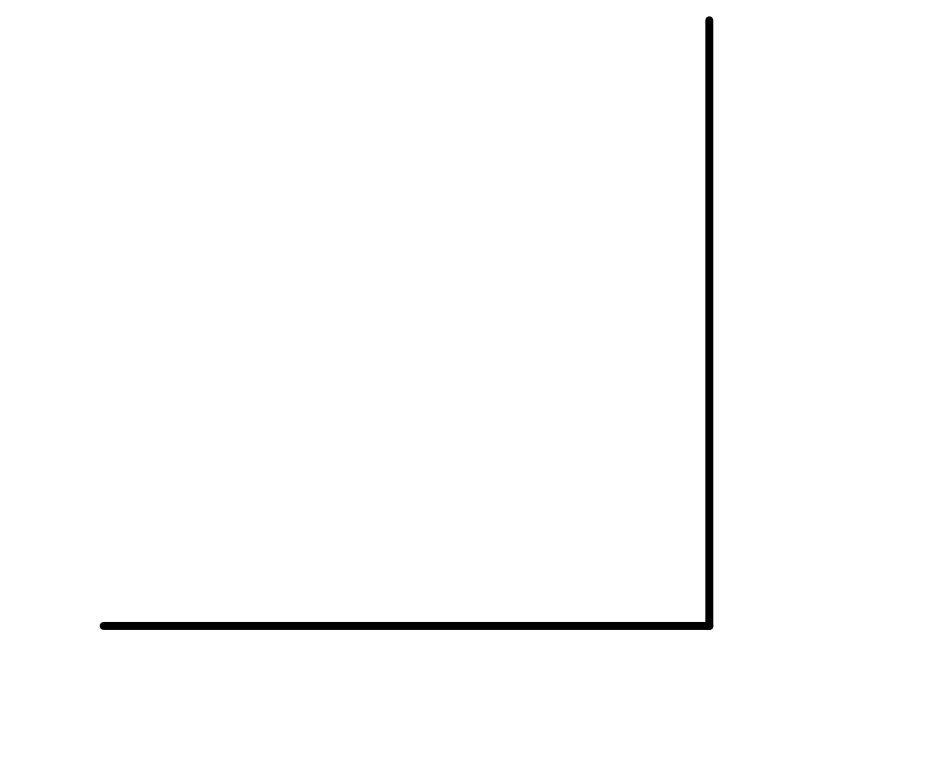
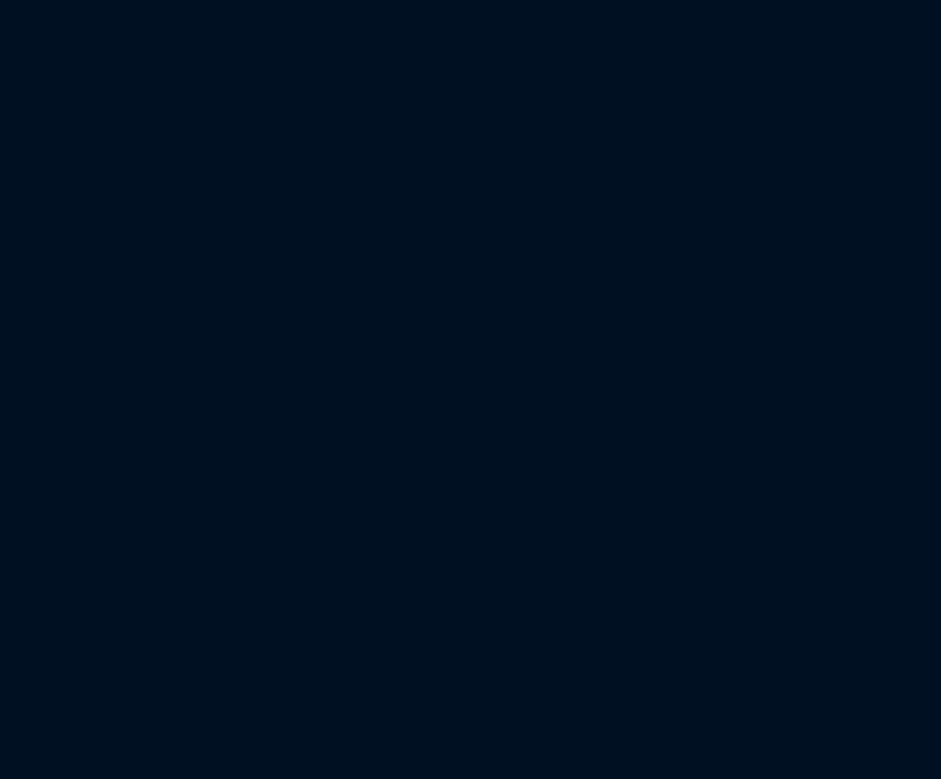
board edge: (709, 20) (709, 625) (103, 625) -> none

